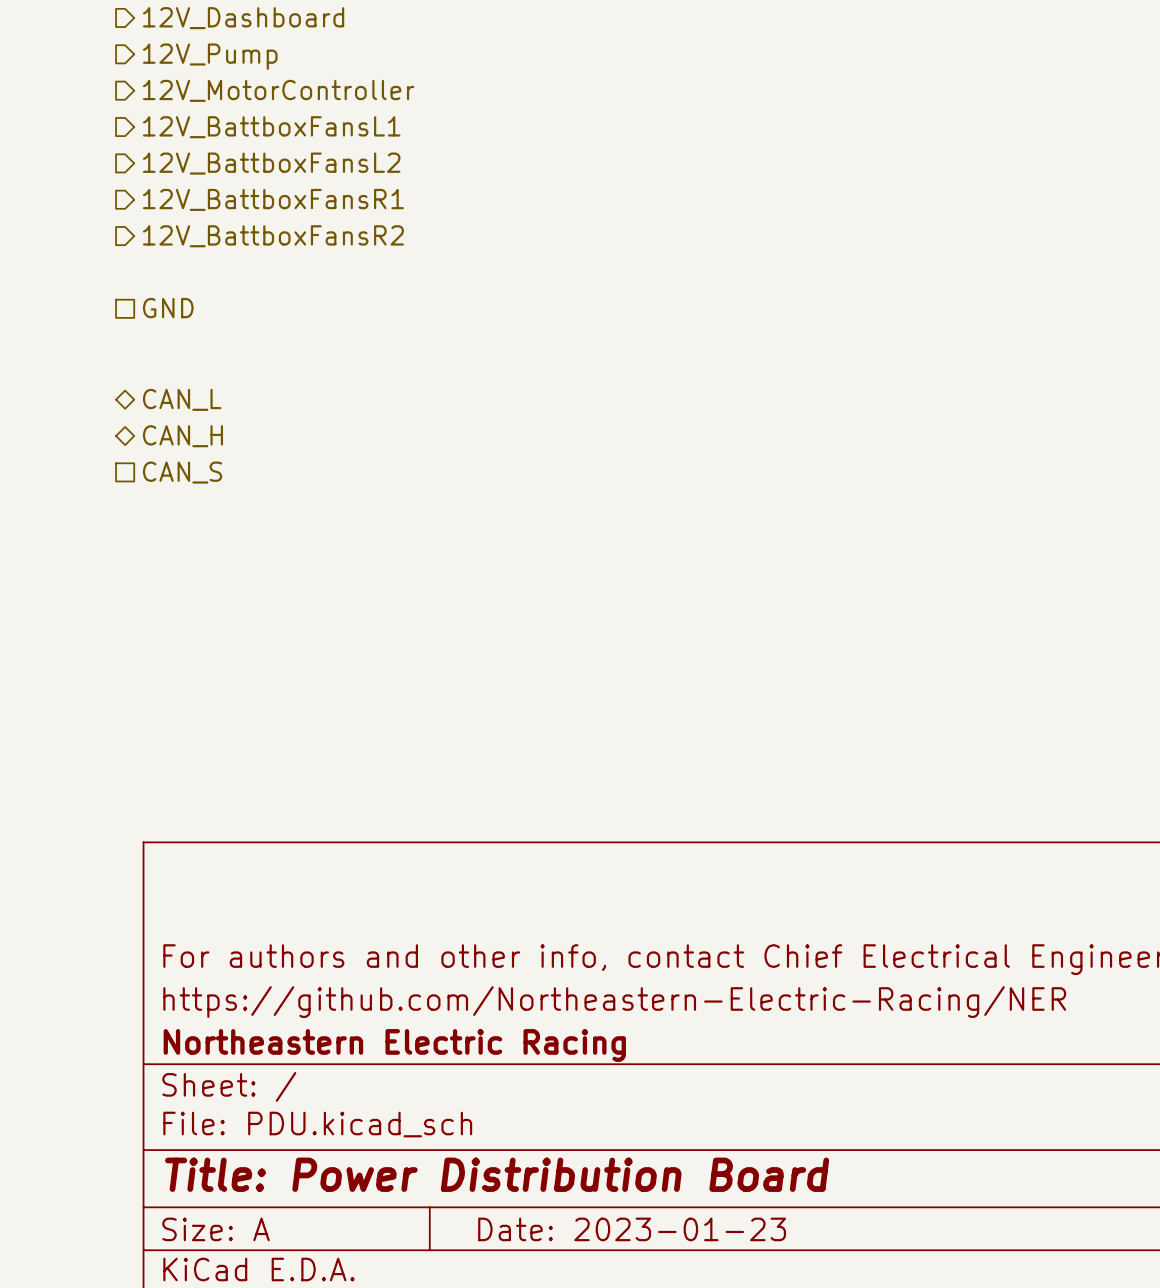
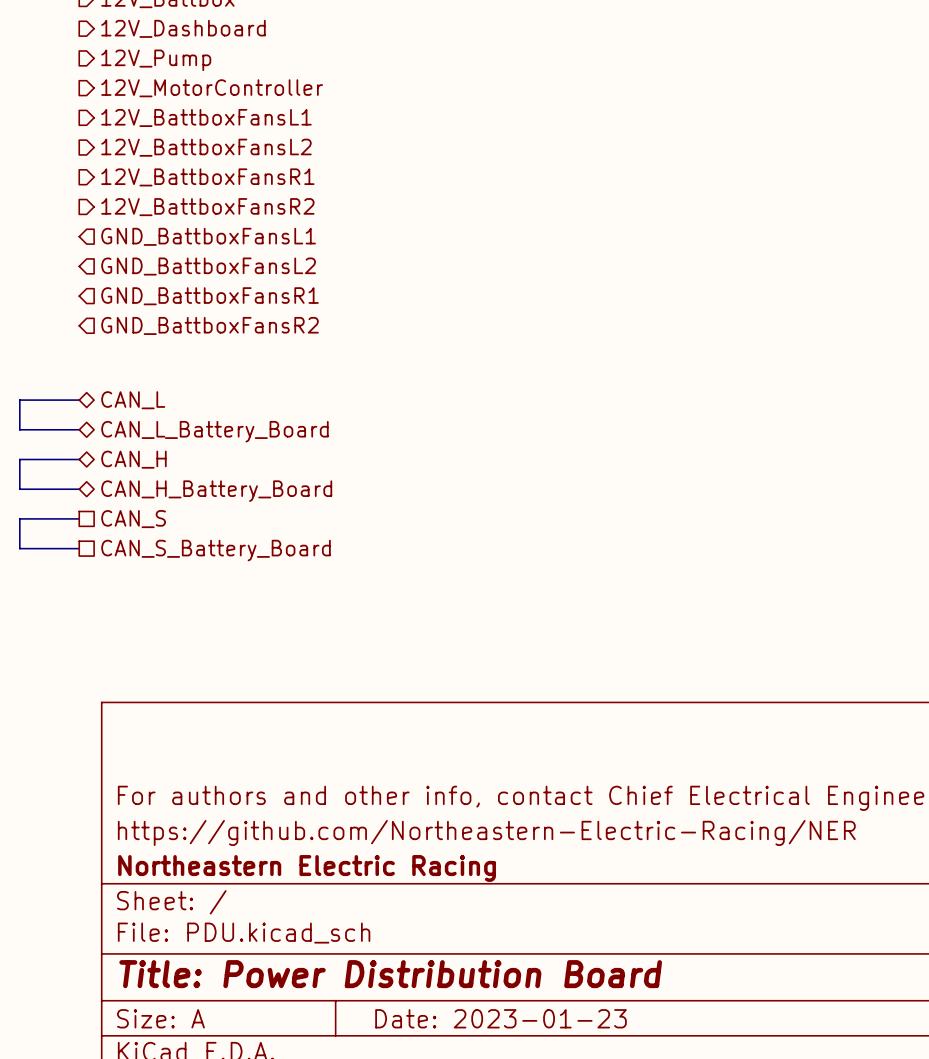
hierarchical label: none -> GND_BattboxFansL1 (208, 236)
hierarchical label shape: passive (168, 308) -> input (208, 266)
hierarchical label: GND (168, 308) -> GND_BattboxFansL2 (208, 266)
hierarchical label: none -> GND_BattboxFansR1 (209, 296)
hierarchical label: none -> GND_BattboxFansR2 (209, 325)
hierarchical label: CAN_L (182, 399) -> none
hierarchical label position: CAN_H (182, 436) -> CAN_H (133, 459)
wire: none -> (79, 400) (19, 400) (19, 429) (79, 429)
hierarchical label shape: passive (182, 472) -> bidirectional (133, 400)
hierarchical label: CAN_S (182, 472) -> CAN_L (133, 400)
hierarchical label: none -> CAN_L_Battery_Board (214, 431)
wire: none -> (79, 459) (19, 459) (19, 489) (79, 489)
hierarchical label: none -> CAN_H_Battery_Board (216, 491)
wire: none -> (79, 518) (19, 518) (19, 548) (79, 548)
hierarchical label: none -> CAN_S (133, 519)
hierarchical label: none -> CAN_S_Battery_Board (216, 550)

